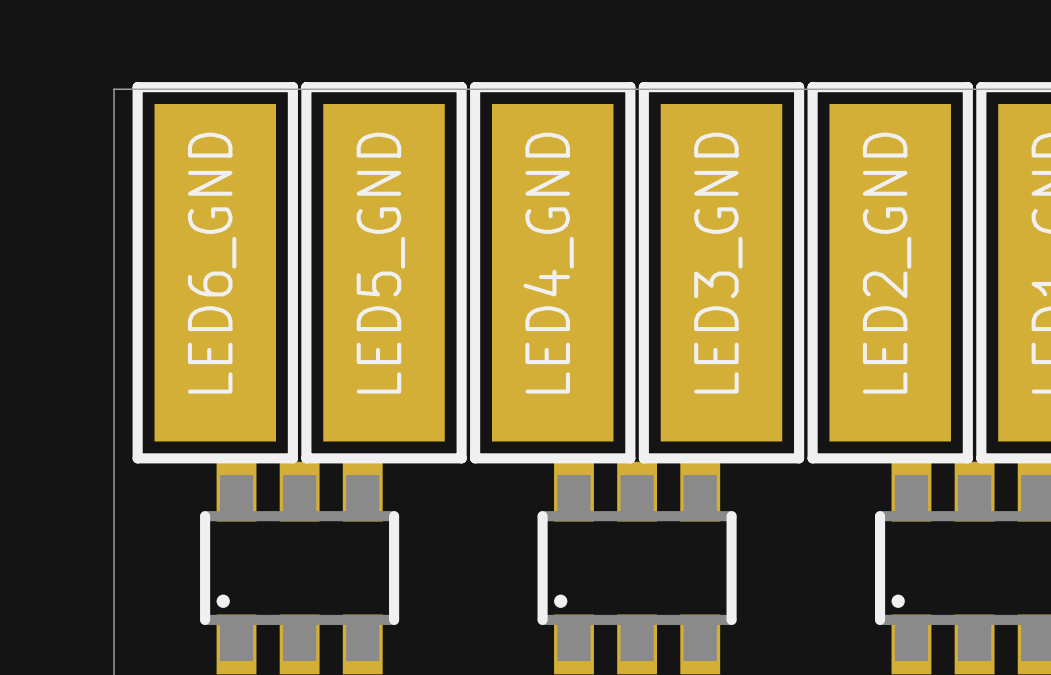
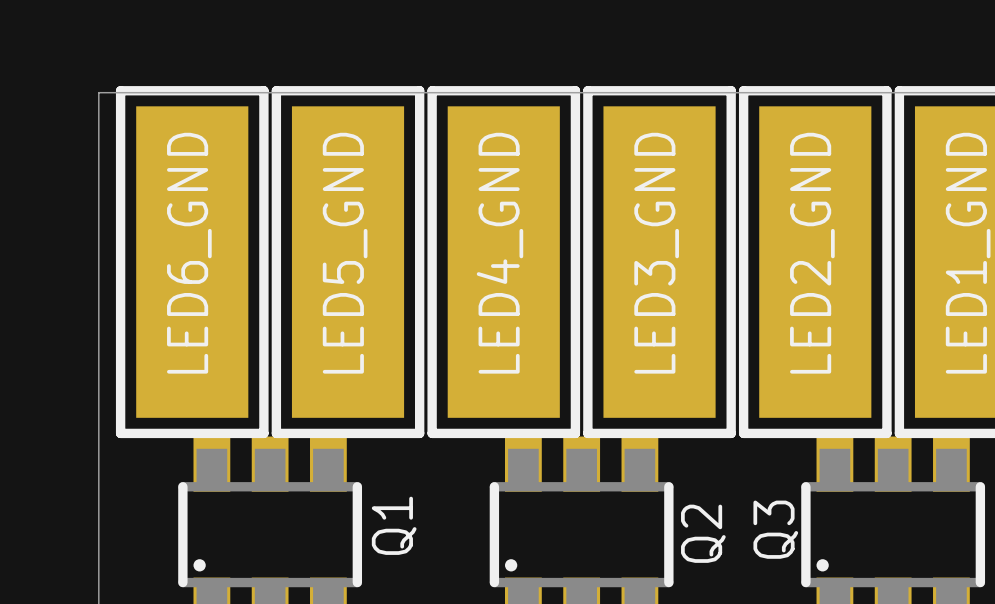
Q1 name: none -> Q1 (394, 525)
Q3 name: none -> Q3 (775, 529)
Q2 name: none -> Q2 (703, 533)

